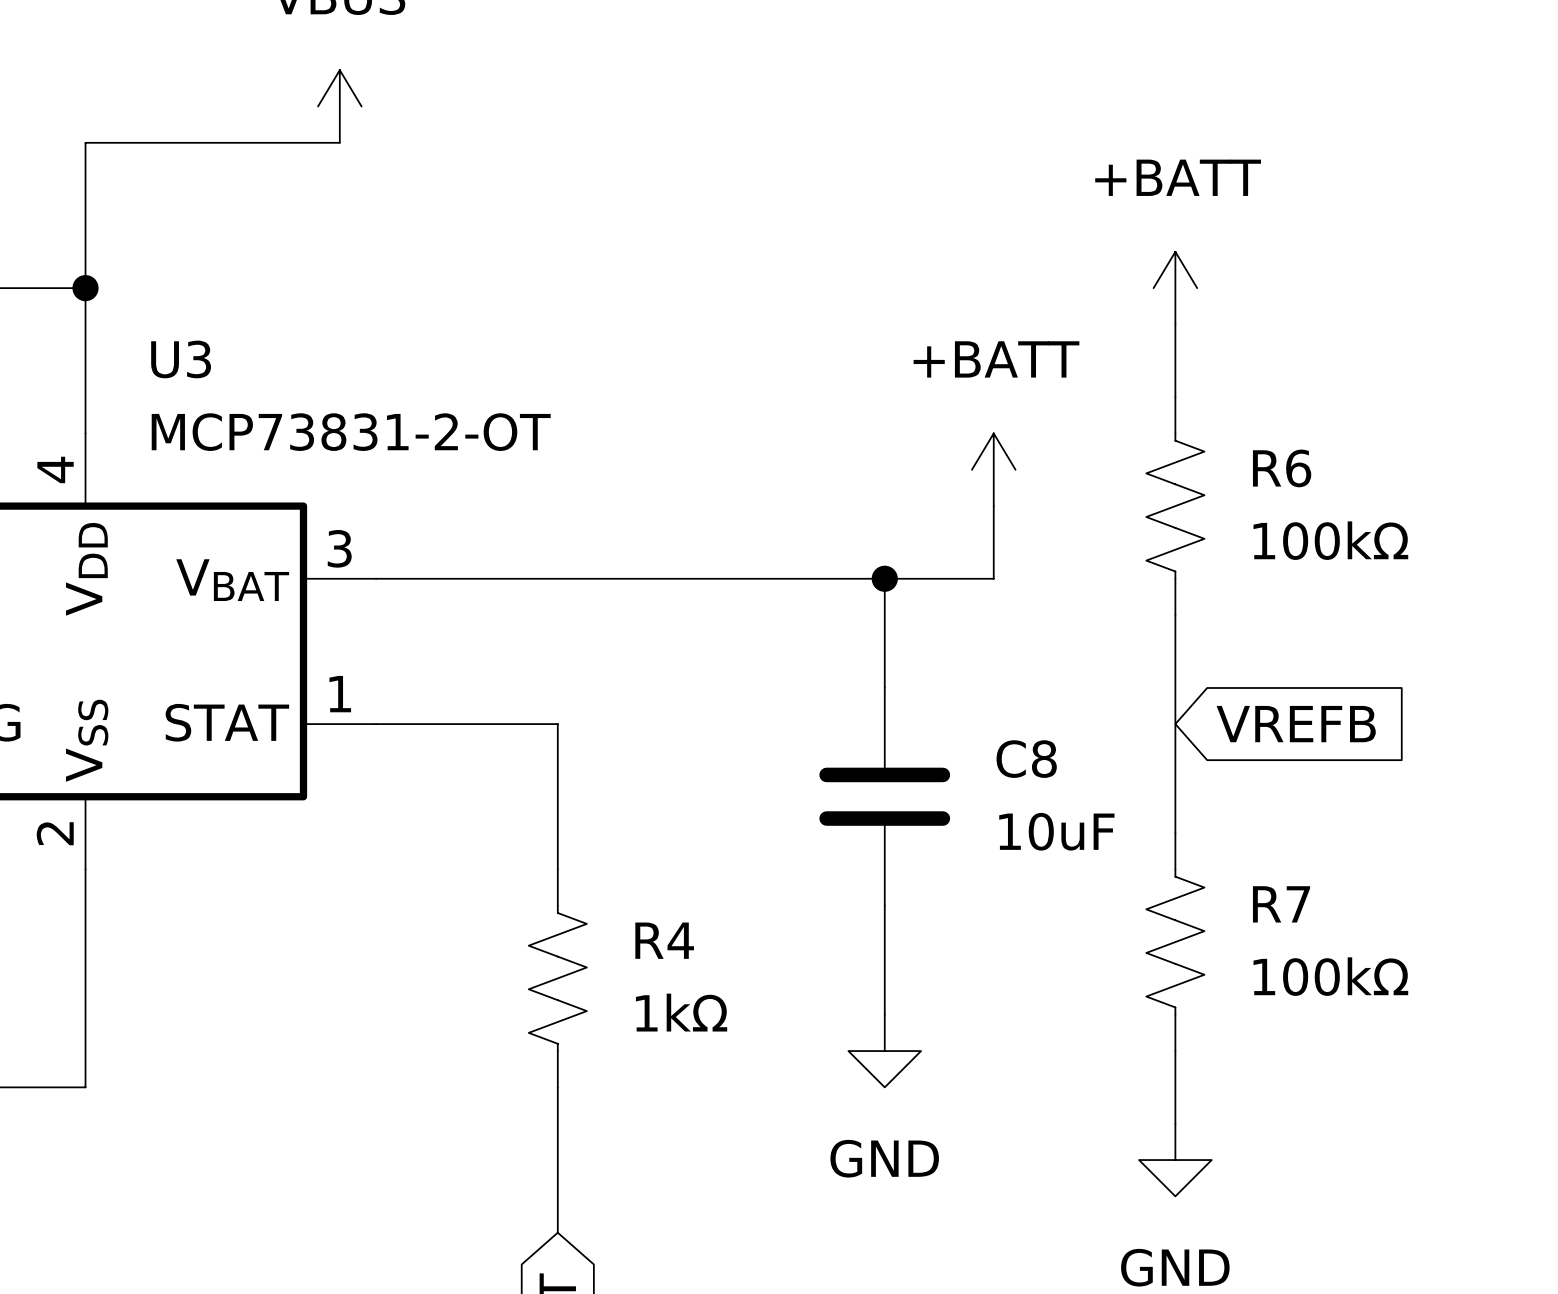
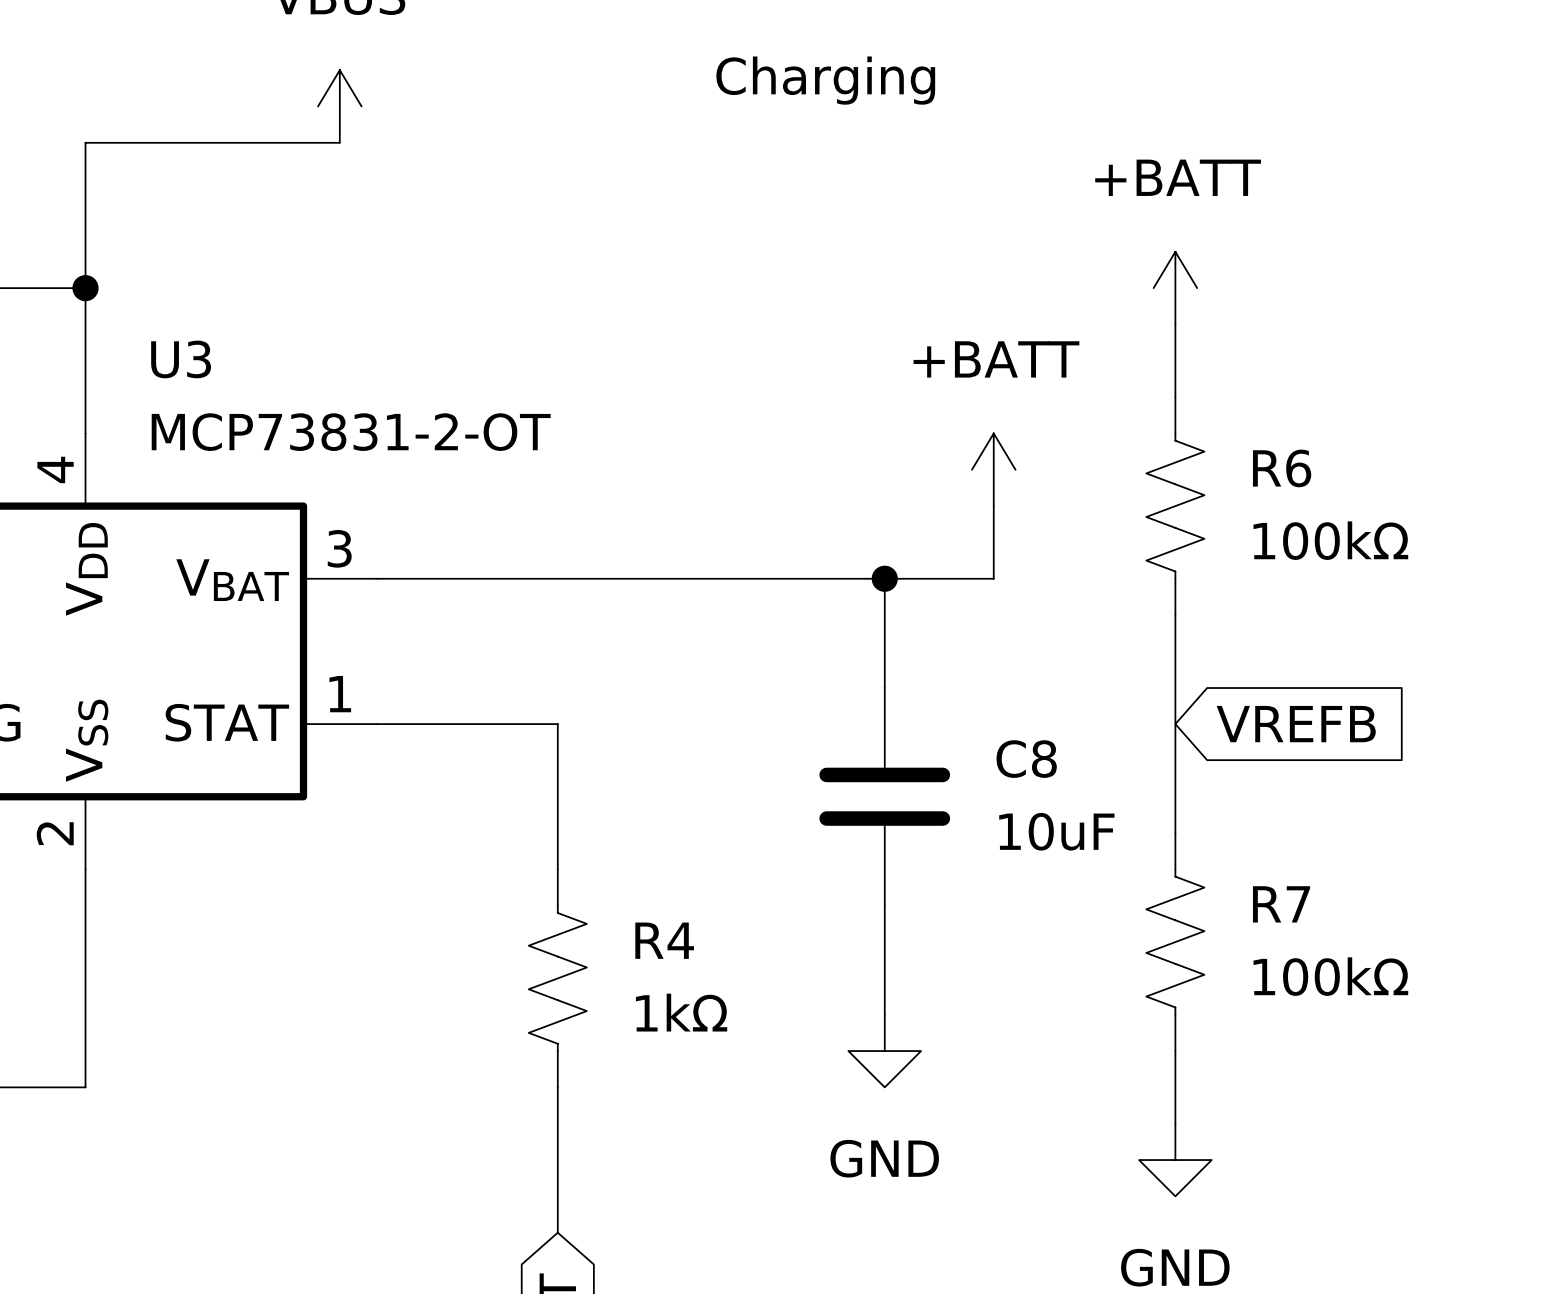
text: none -> Charging (825, 80)

